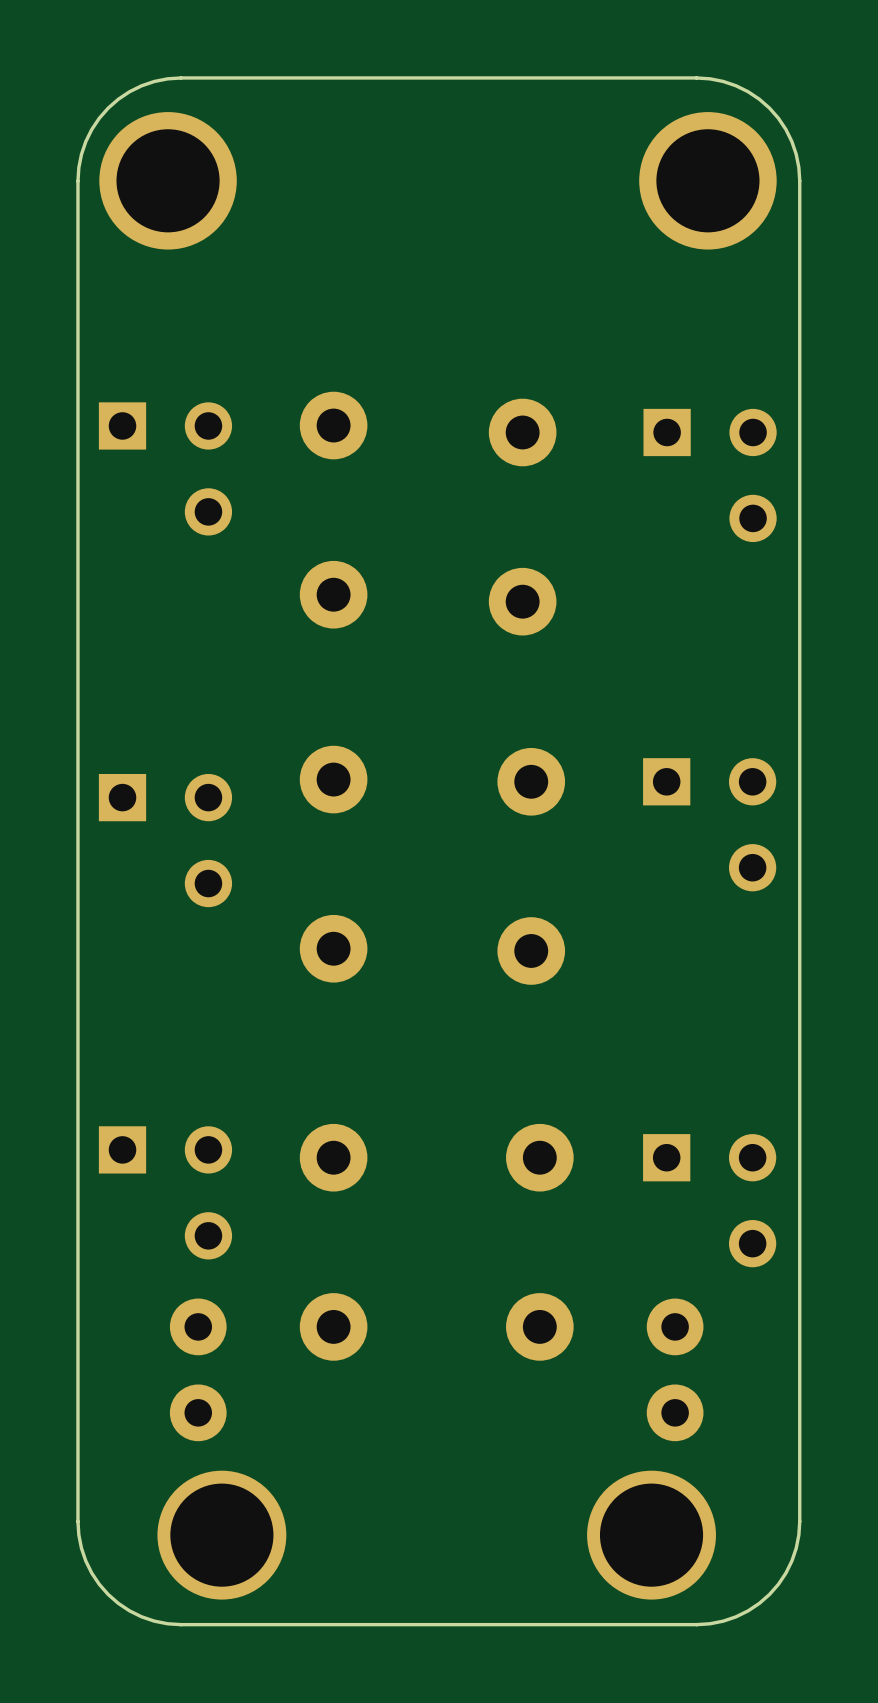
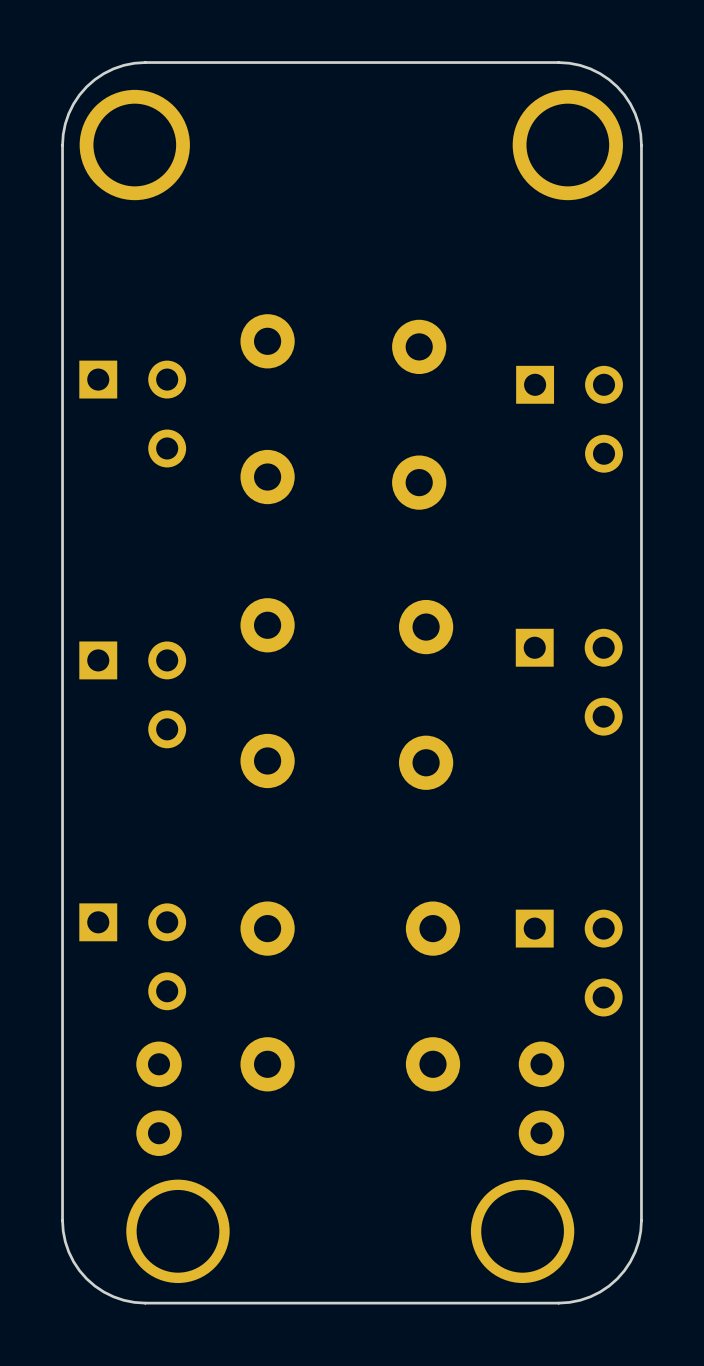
part position: (165, 468) -> (132, 414)
part position: (710, 475) -> (569, 419)
part position: (709, 824) -> (569, 682)
part position: (165, 840) -> (132, 694)

